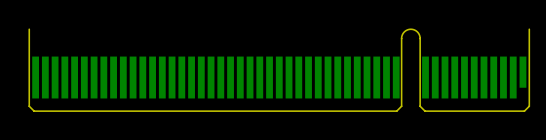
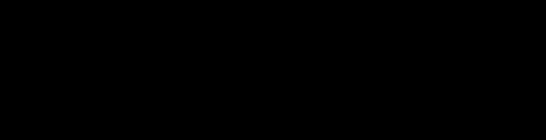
part: (279, 70) -> none

